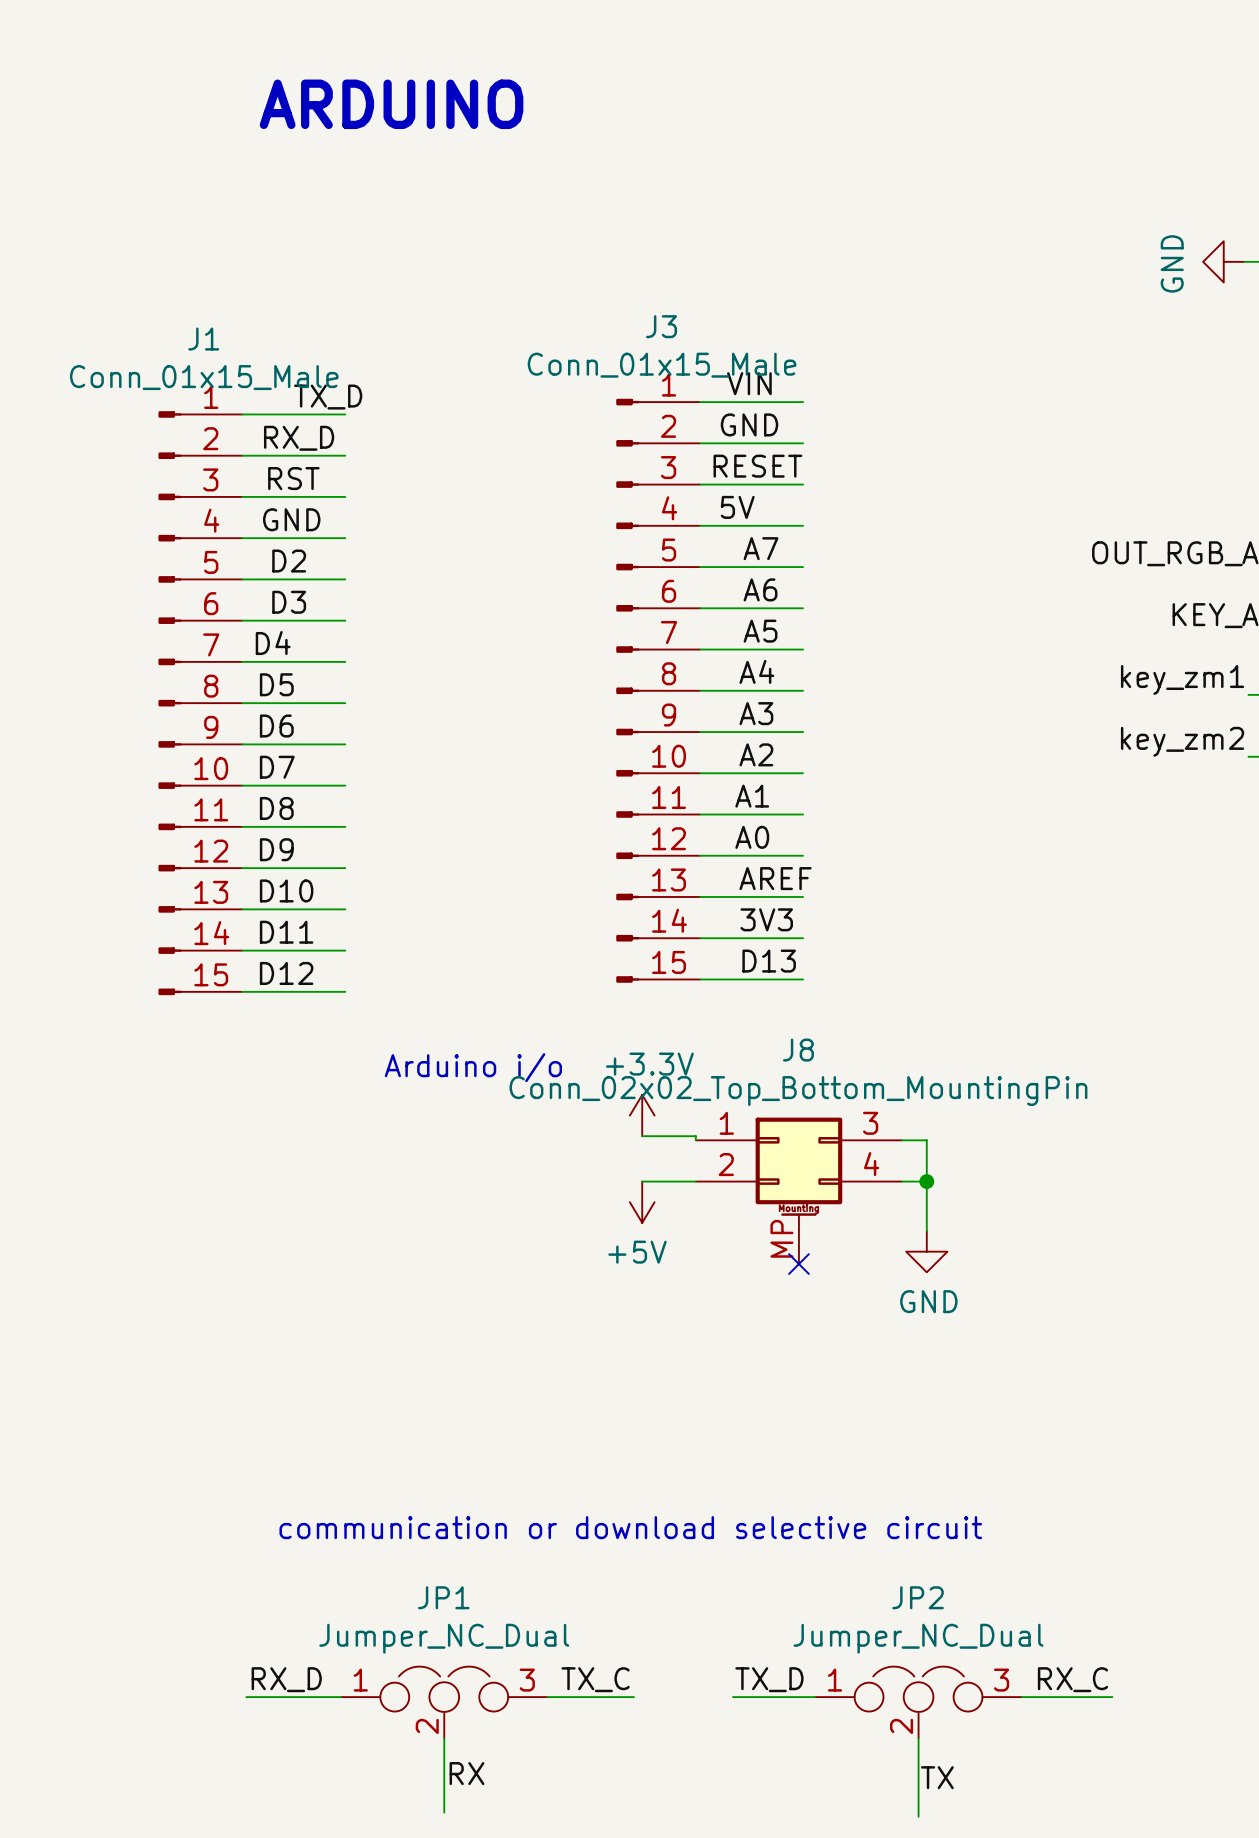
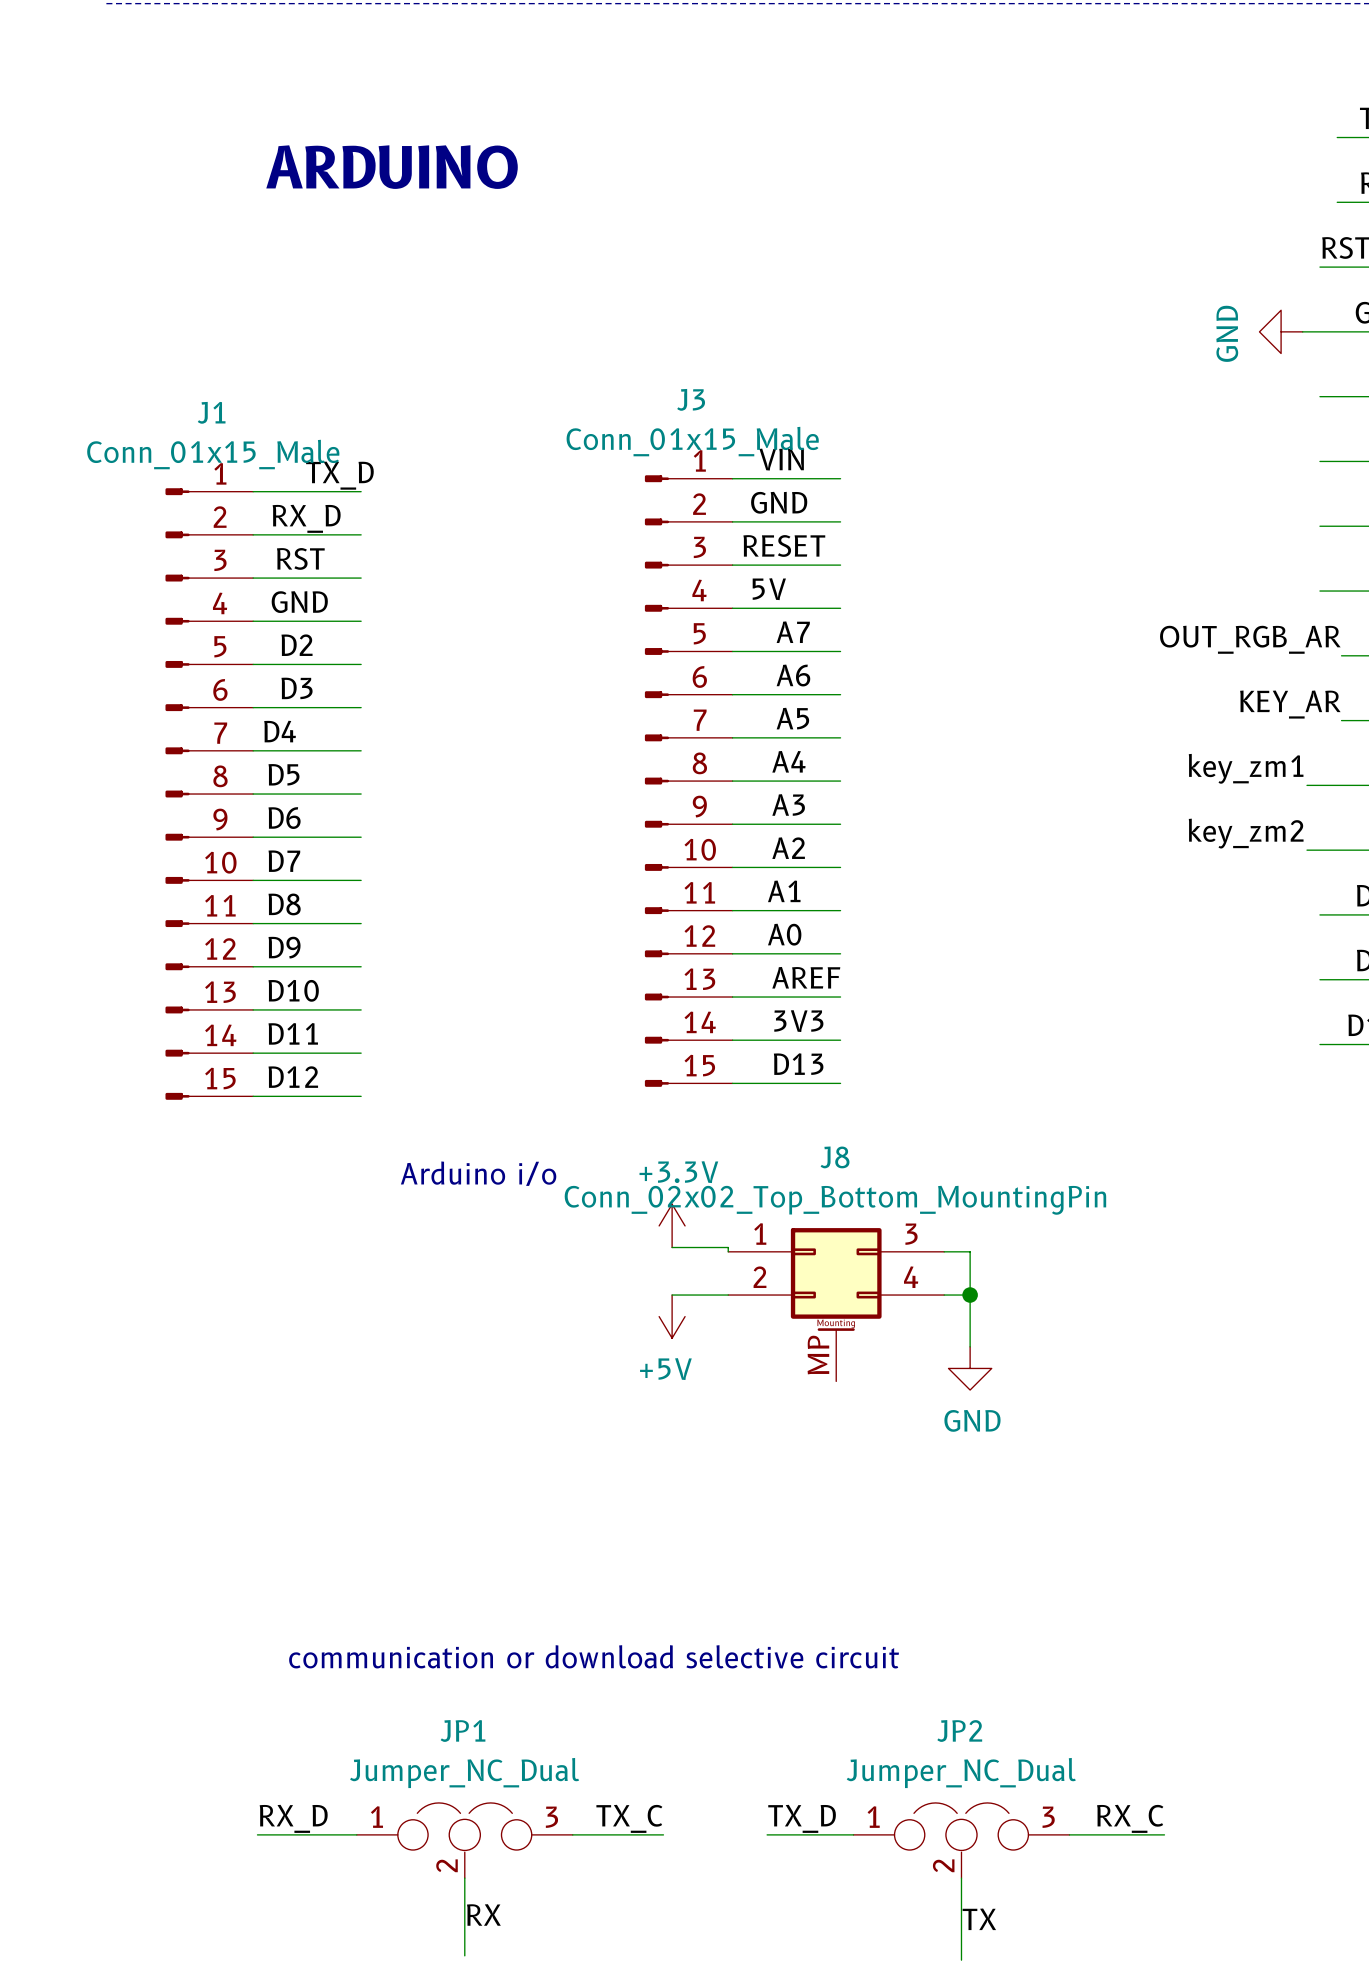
no-connect mark: (798, 1264) -> none

